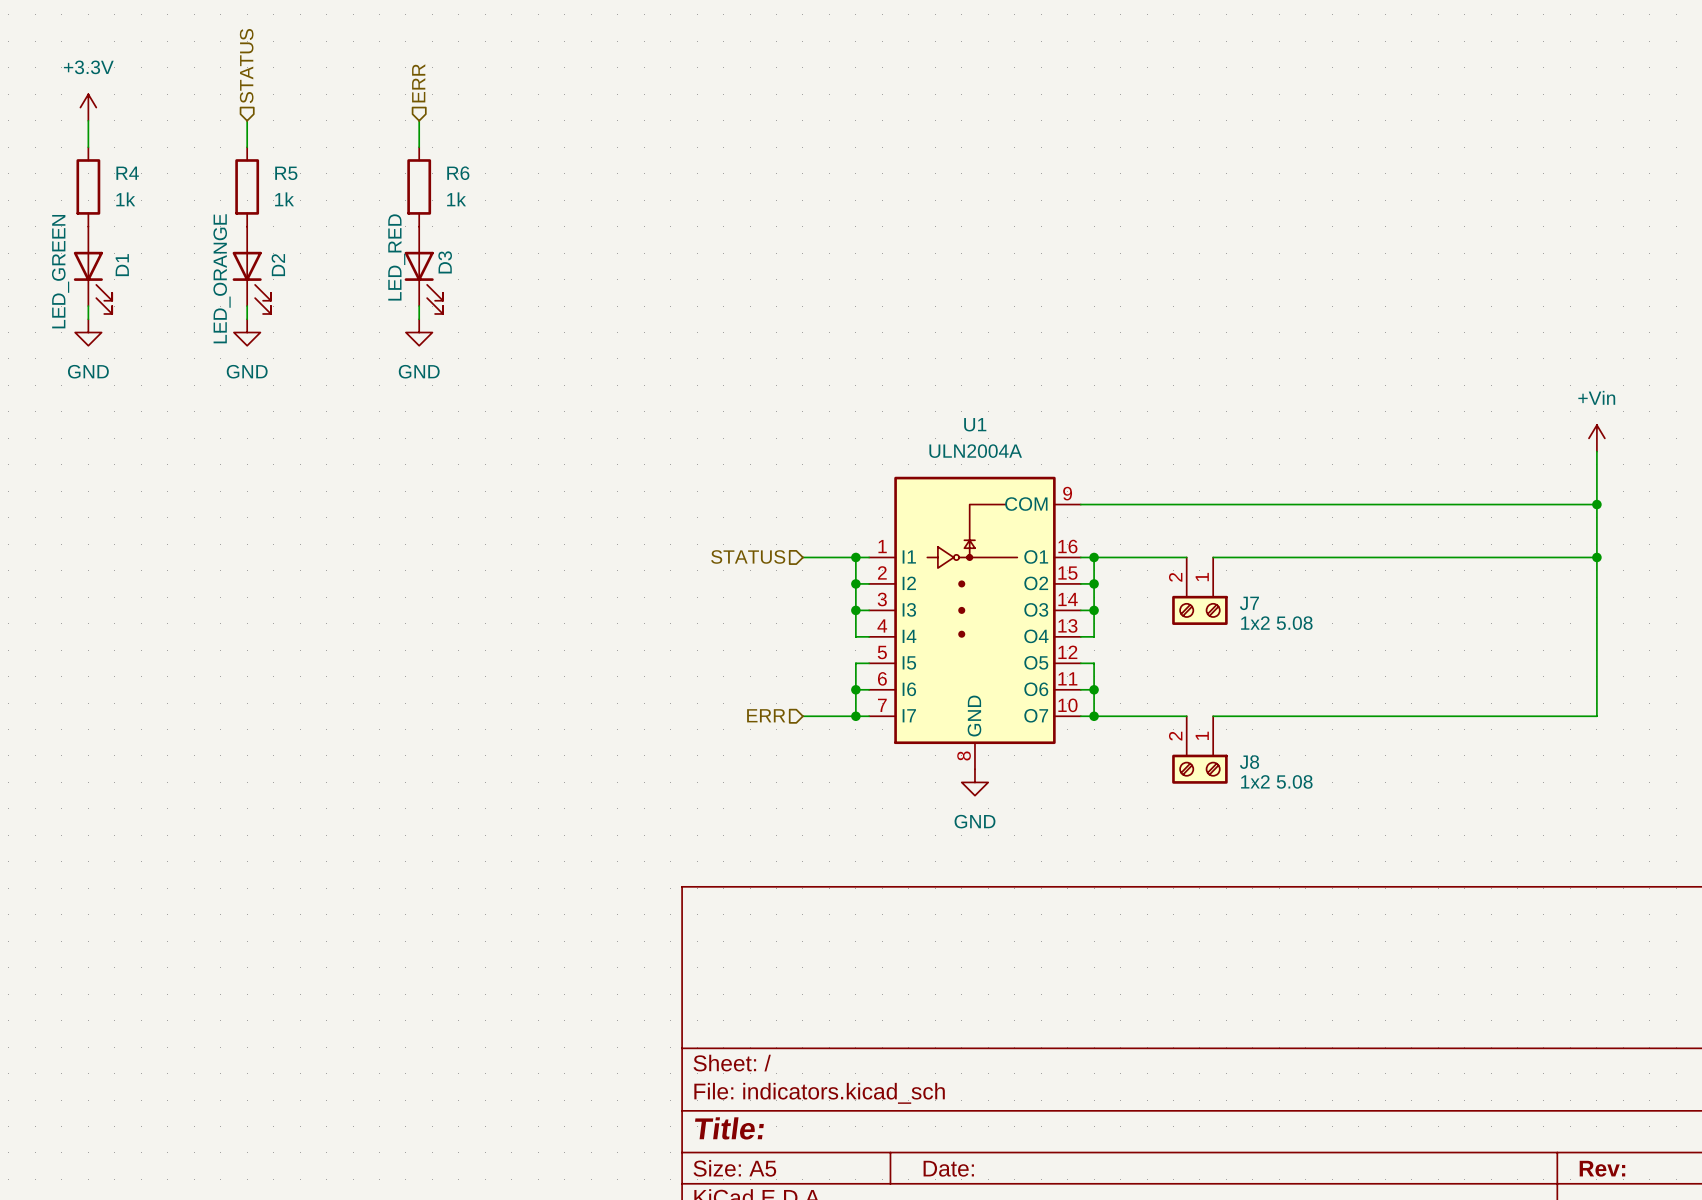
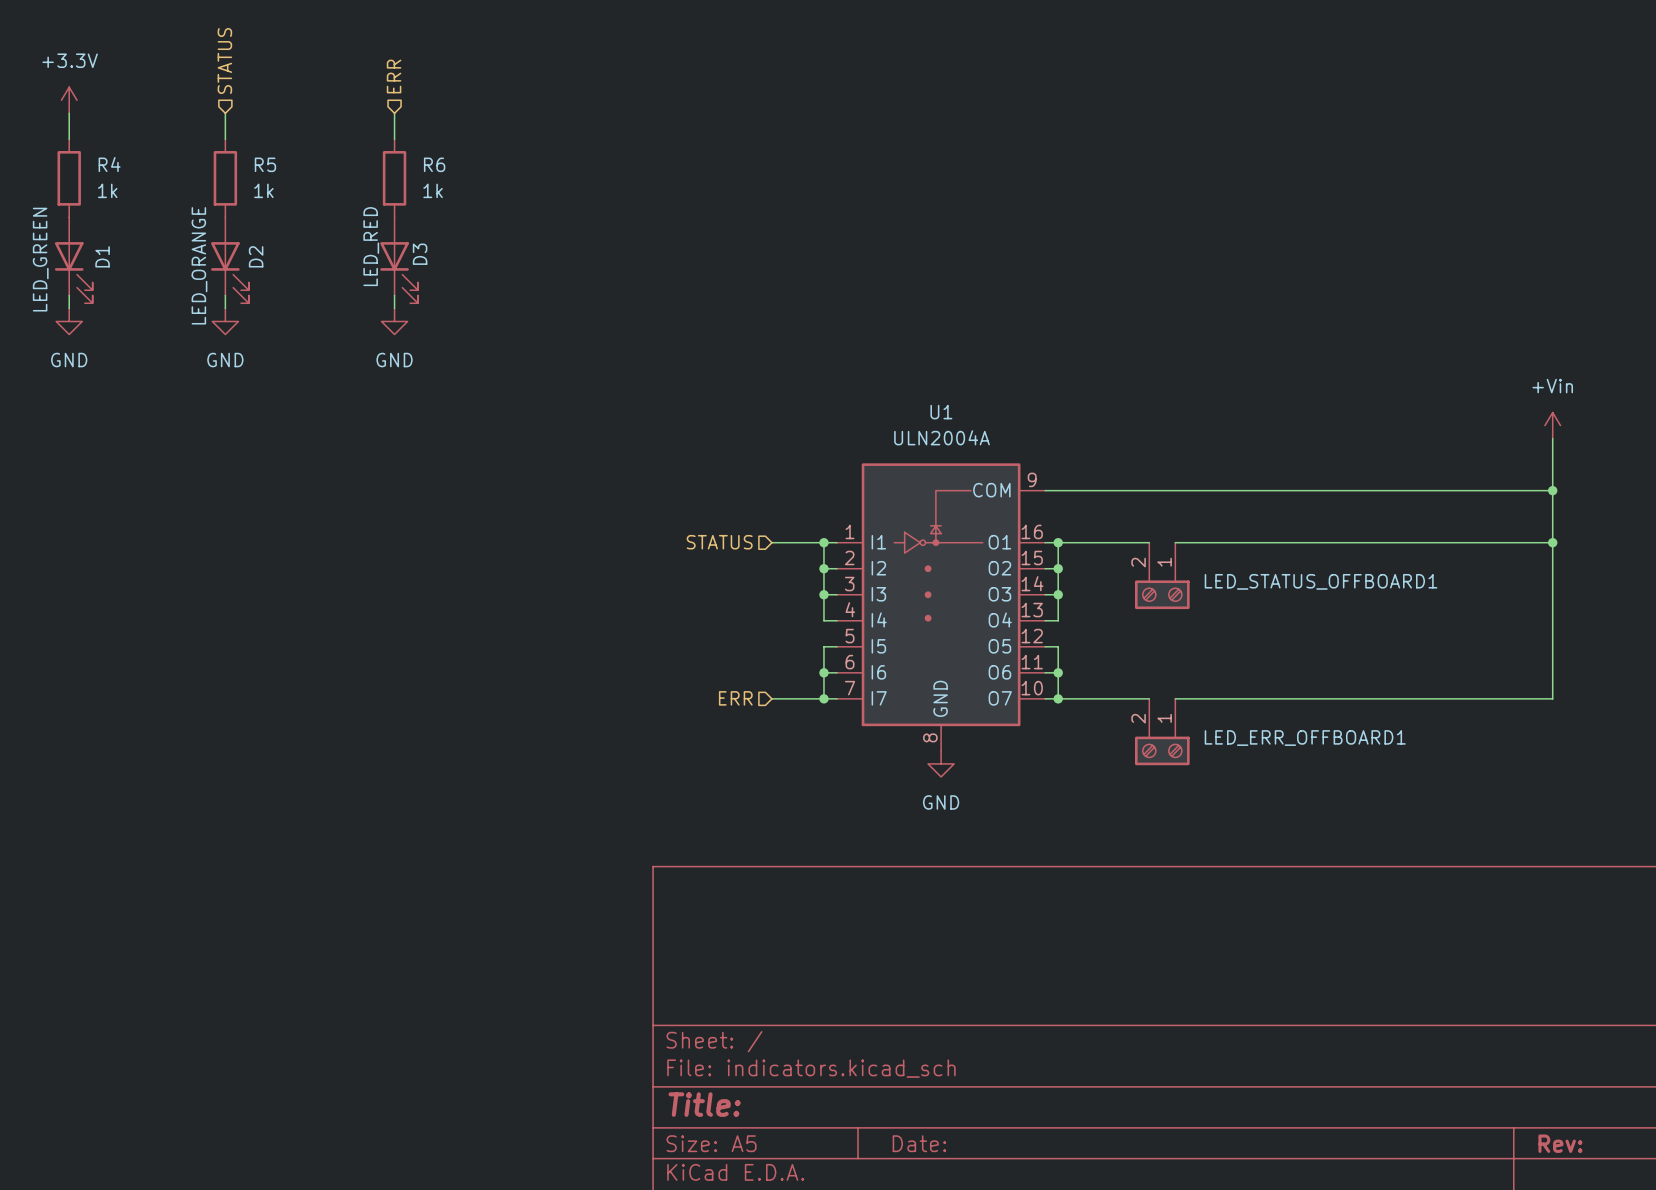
J7 name: J7 (1249, 603) -> LED_STATUS_OFFBOARD1 (1321, 581)
J7 value: 1x2 5.08 (1276, 623) -> none
J8 name: J8 (1249, 762) -> LED_ERR_OFFBOARD1 (1305, 738)
J8 value: 1x2 5.08 (1276, 781) -> none

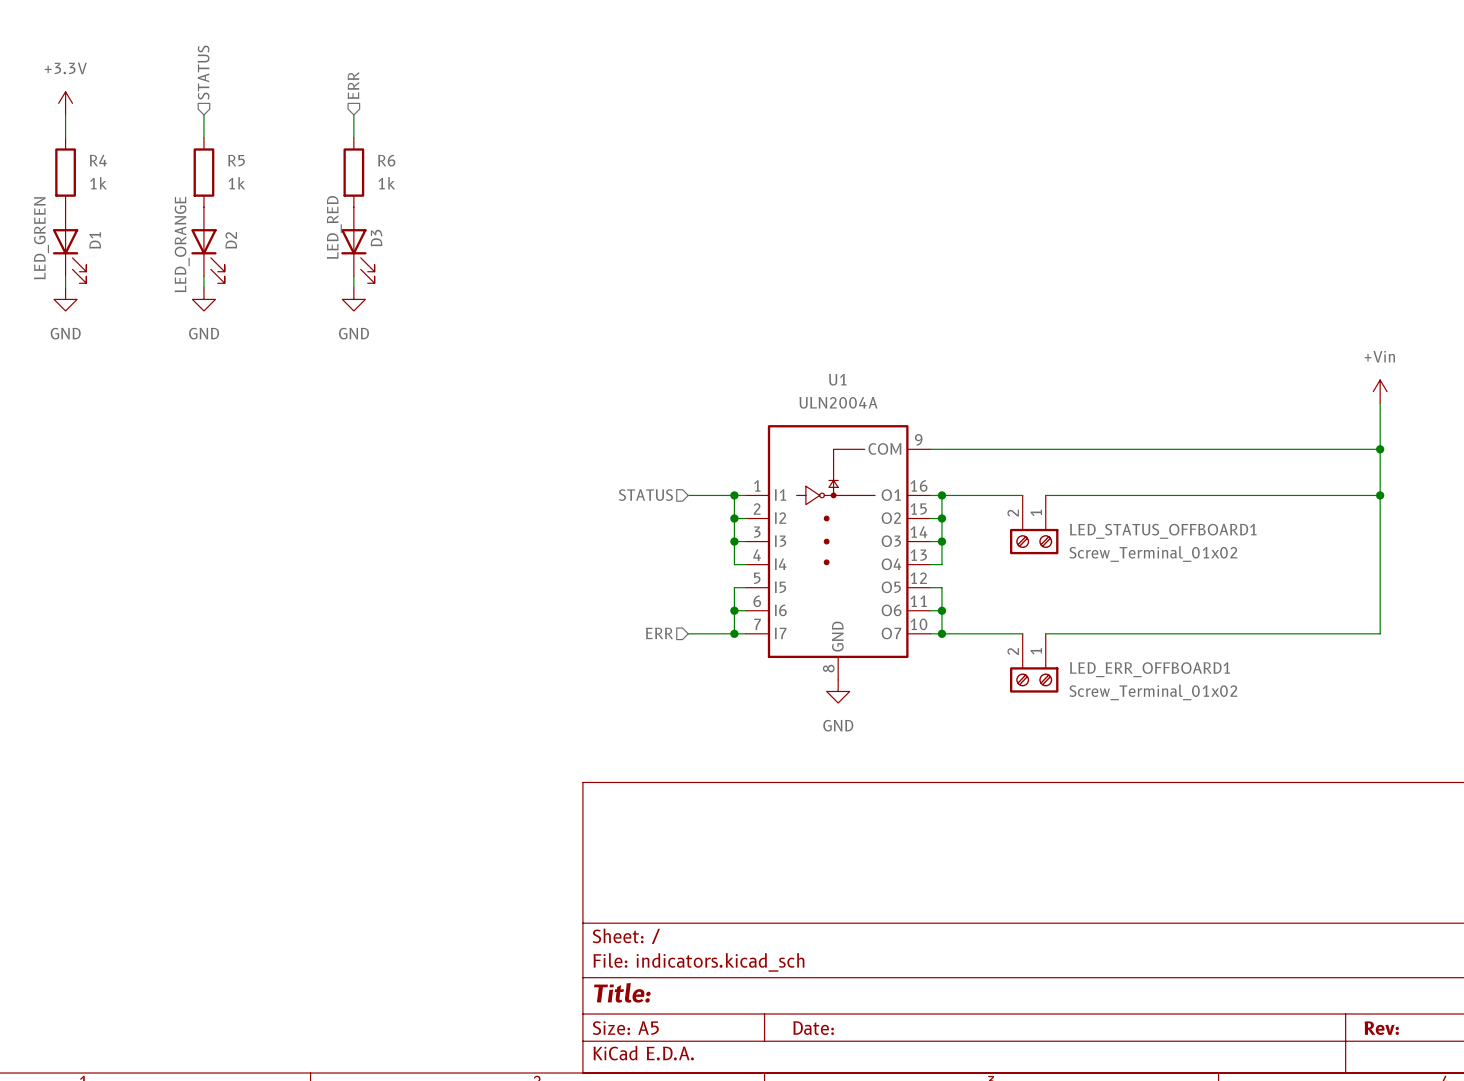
LED_STATUS_OFFBOARD1 value: none -> Screw_Terminal_01x02 (1153, 554)
LED_ERR_OFFBOARD1 value: none -> Screw_Terminal_01x02 (1153, 692)

